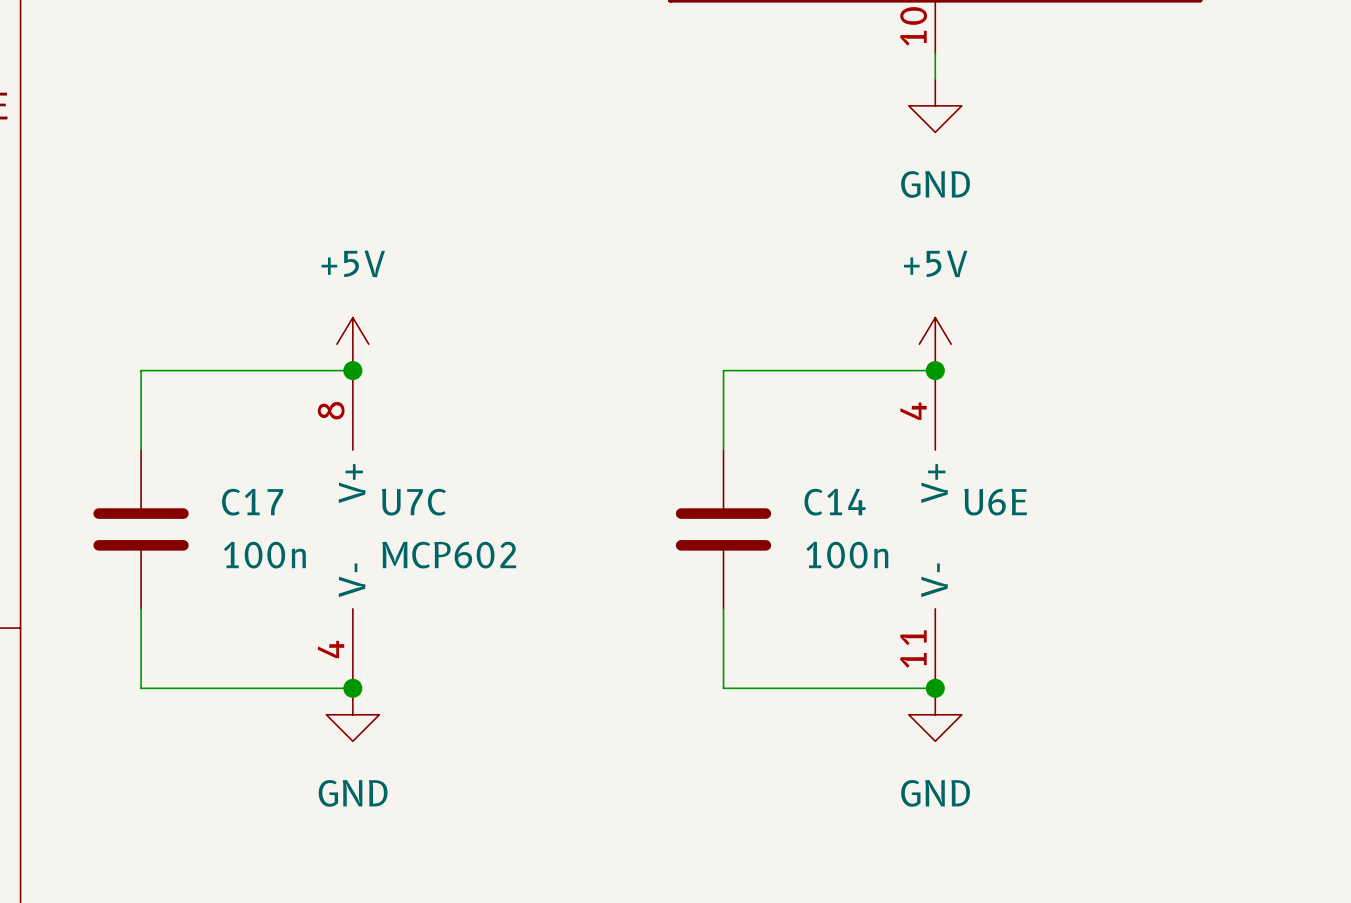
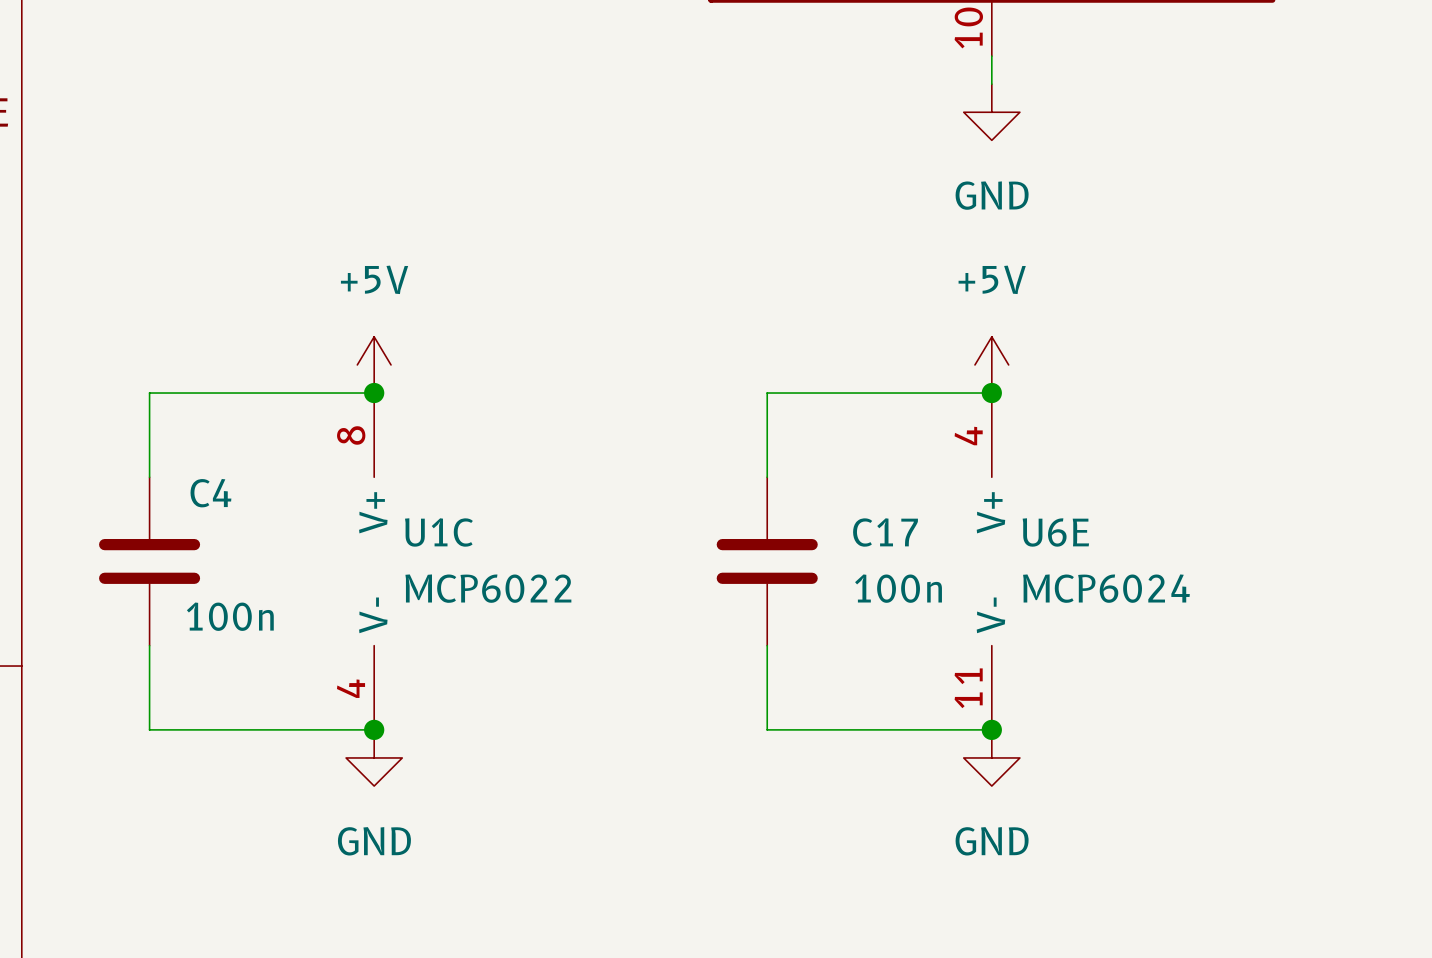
C17 name: C17 (252, 502) -> C4 (210, 493)
U7C name: U7C (413, 502) -> U1C (438, 532)
C14 name: C14 (835, 502) -> C17 (885, 532)
C17 value position: 100n (264, 555) -> 100n (230, 616)
U7C value: MCP602 (449, 555) -> MCP6022 (488, 588)
U6E value: none -> MCP6024 (1106, 588)

